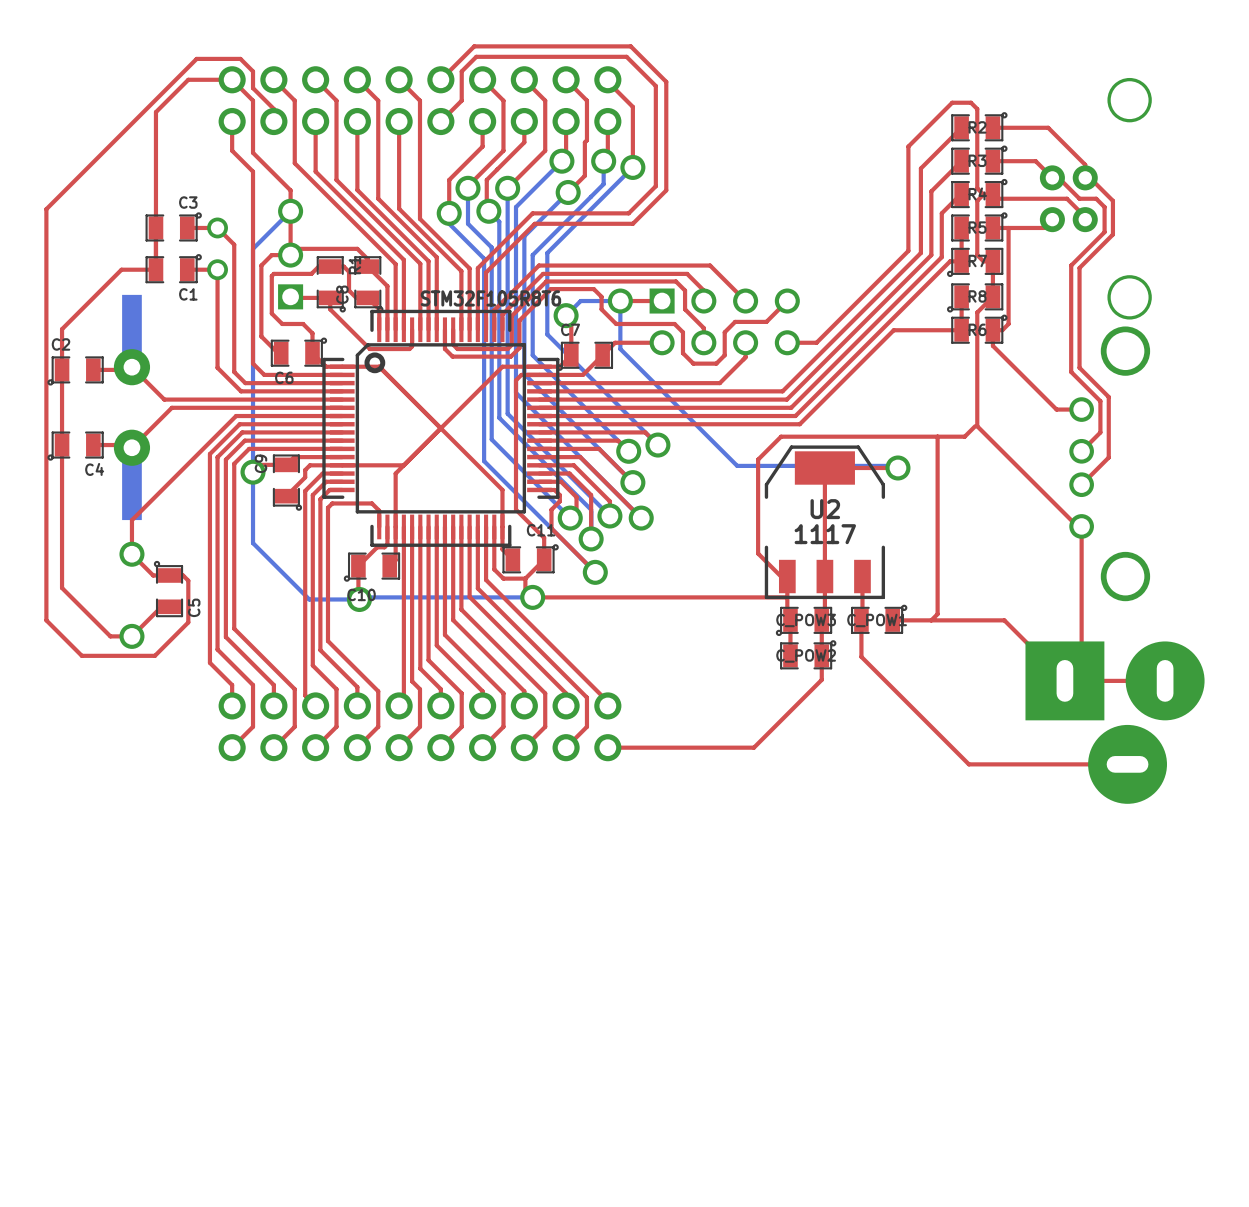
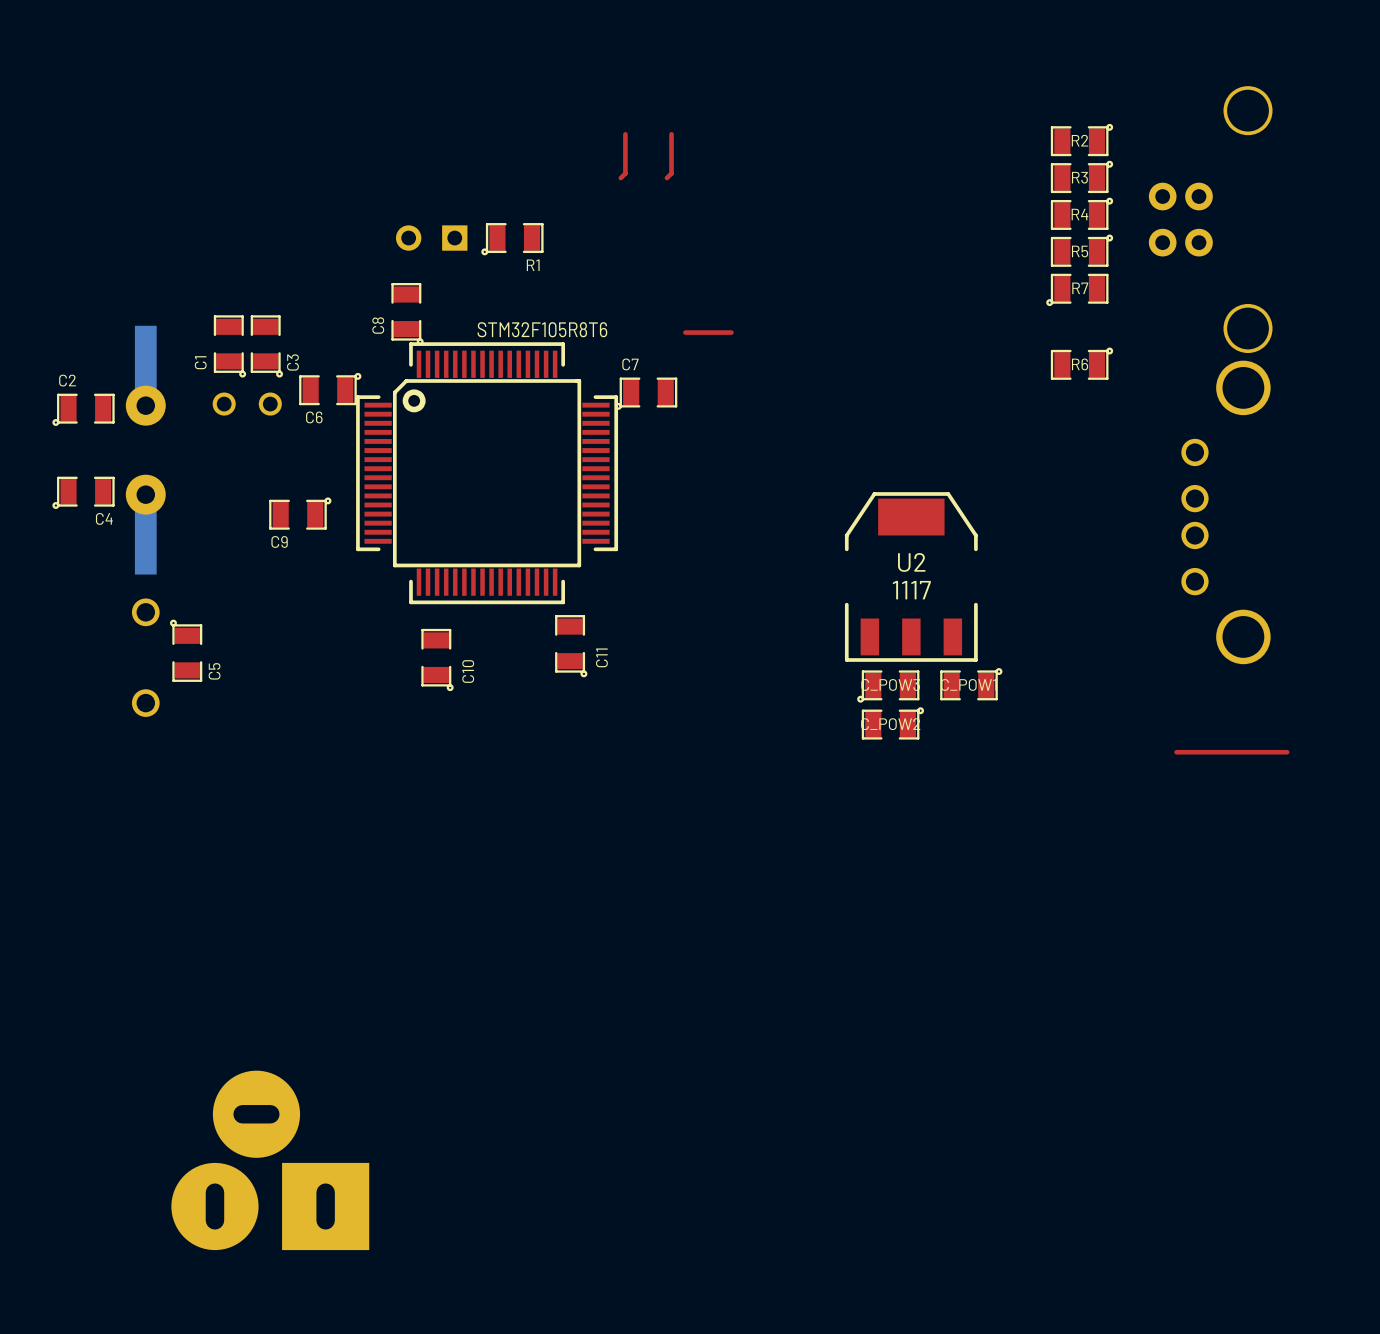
top track: (273, 79) (294, 100) (294, 163) (395, 264) (395, 329) -> none
top track: (315, 79) (336, 100) (336, 179) (420, 263) (420, 329) -> none
top track: (357, 79) (378, 100) (378, 198) (436, 257) (436, 329) -> none
top track: (399, 79) (419, 100) (419, 218) (469, 268) (469, 329) -> none
top track: (440, 79) (474, 46) (630, 46) (666, 81) (666, 190) (632, 223) (534, 223) (486, 272) (486, 329) -> none
top track: (482, 79) (503, 100) (503, 150) (468, 188) -> none
top track: (524, 79) (545, 100) (545, 150) (507, 188) -> none
top track: (566, 79) (586, 100) (584, 175) (568, 192) -> none
top track: (607, 79) (632, 106) (632, 167) -> none
part: (419, 100) -> none
top track: (232, 121) (232, 150) (253, 171) (253, 363) (264, 374) (342, 374) -> none
top track: (273, 121) (273, 109) (253, 88) (253, 71) (240, 58) (196, 58) (46, 209) (46, 620) (81, 655) (154, 655) (188, 622) (188, 580) (183, 575) (153, 575) (131, 554) (131, 520) (236, 416) (342, 416) -> none
top track: (315, 121) (315, 171) (403, 259) (403, 329) -> none
top track: (357, 121) (357, 190) (428, 261) (428, 329) -> none
top track: (399, 121) (399, 208) (461, 271) (461, 329) -> none
top track: (440, 121) (461, 100) (461, 71) (476, 56) (626, 56) (655, 86) (655, 186) (628, 213) (532, 213) (477, 268) (477, 329) -> none
top track: (482, 121) (482, 146) (449, 179) (449, 213) -> none
top track: (524, 121) (524, 142) (486, 179) (486, 209) (488, 211) -> none
top track: (961, 127) (920, 168) (920, 253) (782, 391) (539, 391) -> none
top track: (992, 127) (1048, 127) (1085, 164) (1085, 177) (1089, 177) (1112, 200) (1112, 234) (1079, 267) (1079, 367) (1108, 397) (1108, 457) (1081, 484) -> none
bottom track: (561, 161) (516, 207) (516, 392) (641, 518) -> none
via: (561, 161) -> none
bottom track: (603, 161) (603, 184) (532, 255) (532, 355) (628, 451) -> none
via: (603, 161) -> none
top track: (961, 161) (931, 191) (931, 255) (786, 399) (539, 399) -> none
top track: (992, 161) (1035, 161) (1052, 177) (1058, 177) (1079, 198) (1096, 198) (1104, 207) (1104, 232) (1071, 265) (1071, 371) (1100, 401) (1100, 432) (1081, 451) -> none
bottom track: (632, 167) (547, 253) (547, 334) (657, 445) -> none
via: (632, 167) -> none
bottom track: (468, 188) (468, 223) (491, 247) (491, 439) (570, 518) -> none
via: (468, 188) -> none
bottom track: (507, 188) (507, 413) (609, 516) -> none
via: (507, 188) -> none
bottom track: (568, 192) (524, 236) (524, 374) (632, 482) -> none
via: (568, 192) -> none
top track: (961, 194) (941, 213) (941, 257) (791, 407) (539, 407) -> none
top track: (983, 194) (992, 194) (997, 198) (1067, 198) (1085, 216) (1085, 219) -> none
top track: (983, 194) (977, 188) (977, 109) (971, 102) (952, 102) (908, 146) (908, 250) (816, 342) (787, 342) -> none
top track: (983, 194) (977, 200) (977, 255) (983, 261) (992, 261) (992, 296) (977, 312) (977, 426) (1077, 526) (1081, 526) (1081, 664) (1064, 680) (1004, 620) (892, 620) -> none
bottom track: (290, 211) (253, 248) (253, 543) (309, 599) (359, 599) (361, 597) (532, 597) -> none
via: (290, 211) -> none
bottom track: (488, 211) (499, 221) (499, 417) (591, 509) (591, 538) -> none
via: (488, 211) -> none
bottom track: (449, 213) (449, 223) (484, 258) (484, 461) (595, 572) -> none
via: (449, 213) -> none
part: none -> (431, 238)
top track: (1052, 219) (1044, 227) (992, 227) -> none
C3 rotation: 0° (173, 226) -> 90° clockwise (266, 346)
C3 position: (173, 226) -> (266, 346)
top track: (187, 227) (217, 227) (234, 244) (234, 371) (245, 383) (342, 383) -> none
top track: (961, 227) (961, 261) (950, 261) (795, 416) (539, 416) -> none
top track: (1008, 227) (1008, 323) (1002, 330) (992, 330) (992, 345) (1056, 409) (1081, 409) -> none
part rotation: 0° (217, 248) -> 90° clockwise (247, 404)
part position: (217, 248) -> (247, 404)
top track: (290, 255) (271, 255) (261, 265) (261, 336) (278, 353) (281, 353) -> none
top track: (290, 255) (290, 190) (253, 152) (253, 100) (232, 79) (188, 79) (155, 112) (155, 269) (121, 269) (62, 329) (62, 588) (110, 636) (131, 636) (161, 606) (169, 606) -> none
top track: (290, 255) (296, 248) (357, 248) (367, 259) (367, 266) (387, 286) (387, 329) -> none
C1 rotation: 0° (173, 268) -> 90° clockwise (229, 346)
C1 position: (173, 268) -> (229, 346)
top track: (187, 269) (217, 269) (217, 367) (241, 391) (342, 391) -> none
part: (290, 275) -> none
R1 rotation: 0° (331, 284) -> 90° clockwise (512, 239)
R1 position: (331, 284) -> (512, 239)
top track: (290, 296) (330, 297) (330, 309) (369, 349) (409, 349) (412, 346) (412, 329) -> none
top track: (961, 296) (961, 330) (893, 330) (799, 424) (539, 424) -> none
R8: (975, 297) -> none
via: (620, 301) -> none
top track: (703, 301) (703, 290) (687, 273) (543, 273) (502, 314) (502, 329) -> none
top track: (745, 301) (710, 265) (538, 265) (494, 310) (494, 329) -> none
top track: (787, 301) (766, 321) (735, 321) (724, 332) (724, 355) (716, 363) (693, 363) (682, 353) (682, 332) (674, 323) (616, 323) (601, 309) (601, 296) (593, 289) (550, 289) (519, 320) (519, 348) (510, 356) (452, 356) (444, 348) (444, 329) -> none
top track: (566, 315) (571, 320) (571, 355) (559, 366) (502, 366) (395, 473) (395, 560) (389, 566) -> none
bottom track: (566, 315) (580, 301) (620, 301) (620, 349) (737, 465) (895, 465) (897, 468) -> none
via: (566, 315) -> none
part: (724, 321) -> none
top track: (379, 329) (379, 309) (367, 297) (356, 297) (349, 290) (349, 271) (343, 266) (318, 266) (311, 273) (273, 273) (271, 275) (271, 313) (282, 323) (303, 323) (312, 333) (312, 353) (326, 366) (379, 366) (502, 489) (502, 549) (512, 559) -> none
top track: (453, 329) (453, 344) (457, 349) (507, 349) (511, 344) (511, 315) (546, 281) (675, 281) (685, 290) (685, 309) (703, 328) (703, 342) -> none
top track: (662, 342) (615, 342) (583, 374) (521, 374) (516, 380) (516, 509) (544, 537) (544, 559) (525, 578) -> none
top track: (745, 342) (745, 357) (719, 383) (539, 383) -> none
top track: (93, 369) (129, 369) (131, 367) (164, 399) (342, 399) -> none
top track: (342, 407) (171, 407) (131, 447) (129, 445) (93, 445) -> none
top track: (342, 424) (239, 424) (209, 454) (209, 662) (232, 685) (232, 705) -> none
top track: (975, 426) (964, 436) (781, 436) (758, 459) (758, 553) (781, 576) (787, 576) (787, 617) (790, 620) (790, 655) -> none
top track: (342, 432) (242, 432) (217, 457) (217, 649) (253, 685) (253, 726) (232, 747) -> none
top track: (539, 432) (645, 432) (657, 445) -> none
top track: (937, 436) (937, 614) (931, 620) -> none
top track: (342, 440) (244, 440) (225, 459) (225, 637) (273, 685) (273, 705) -> none
top track: (539, 440) (618, 440) (628, 451) -> none
via: (657, 445) -> none
top track: (342, 448) (249, 448) (234, 463) (234, 628) (294, 689) (294, 726) (273, 747) -> none
top track: (539, 448) (599, 448) (632, 482) -> none
via: (628, 451) -> none
top track: (342, 457) (294, 457) (286, 464) (260, 464) (253, 472) -> none
top track: (539, 457) (580, 457) (641, 518) -> none
top track: (403, 465) (309, 465) (305, 470) (305, 477) (286, 496) -> none
top track: (539, 465) (573, 465) (609, 501) (609, 516) -> none
top track: (897, 468) (824, 468) (824, 617) (821, 620) (821, 679) (753, 747) (607, 747) -> none
via: (897, 468) -> none
via: (253, 472) -> none
top track: (342, 473) (322, 473) (305, 490) (305, 695) (315, 705) -> none
top track: (539, 473) (569, 473) (591, 495) (591, 538) -> none
top track: (342, 481) (326, 481) (312, 495) (312, 665) (336, 689) (336, 726) (315, 747) -> none
top track: (539, 481) (561, 481) (576, 497) (576, 511) (570, 518) -> none
C9 rotation: 0° (287, 482) -> 90° counterclockwise (300, 513)
via: (632, 482) -> none
top track: (342, 489) (329, 489) (320, 499) (320, 650) (357, 687) (357, 705) -> none
top track: (539, 489) (554, 489) (559, 495) (559, 501) (551, 509) (551, 528) (595, 572) -> none
via: (609, 516) -> none
via: (570, 518) -> none
via: (641, 518) -> none
top track: (379, 526) (379, 510) (371, 503) (332, 503) (327, 507) (327, 641) (378, 691) (378, 726) (357, 747) -> none
top track: (387, 526) (387, 544) (384, 547) (377, 547) (358, 566) (359, 599) -> none
top track: (403, 526) (403, 701) (399, 705) -> none
top track: (412, 526) (412, 681) (419, 689) (419, 726) (399, 747) -> none
top track: (420, 526) (420, 668) (440, 689) (440, 705) -> none
top track: (428, 526) (428, 660) (461, 693) (461, 726) (440, 747) -> none
top track: (436, 526) (436, 645) (482, 691) (482, 705) -> none
top track: (444, 526) (444, 634) (503, 693) (503, 726) (482, 747) -> none
top track: (453, 526) (453, 620) (524, 691) (524, 705) -> none
top track: (461, 526) (461, 609) (545, 693) (545, 726) (524, 747) -> none
top track: (469, 526) (469, 596) (566, 693) (566, 705) -> none
top track: (477, 526) (477, 588) (586, 697) (586, 726) (566, 747) -> none
top track: (486, 526) (486, 579) (607, 701) (607, 705) -> none
top track: (494, 526) (494, 569) (503, 578) (525, 578) -> none
via: (591, 538) -> none
C11 rotation: 0° (530, 558) -> 90° clockwise (571, 646)
C10 rotation: 0° (371, 567) -> 90° counterclockwise (437, 660)
C10 position: (371, 567) -> (437, 660)
via: (595, 572) -> none
top track: (862, 576) (861, 656) (968, 764) (1127, 764) -> none
top track: (525, 578) (525, 590) (532, 597) (787, 597) -> none
via: (532, 597) -> none
via: (359, 599) -> none
part: (1115, 722) -> none
part: (419, 726) -> none
part: none -> (270, 1160)

